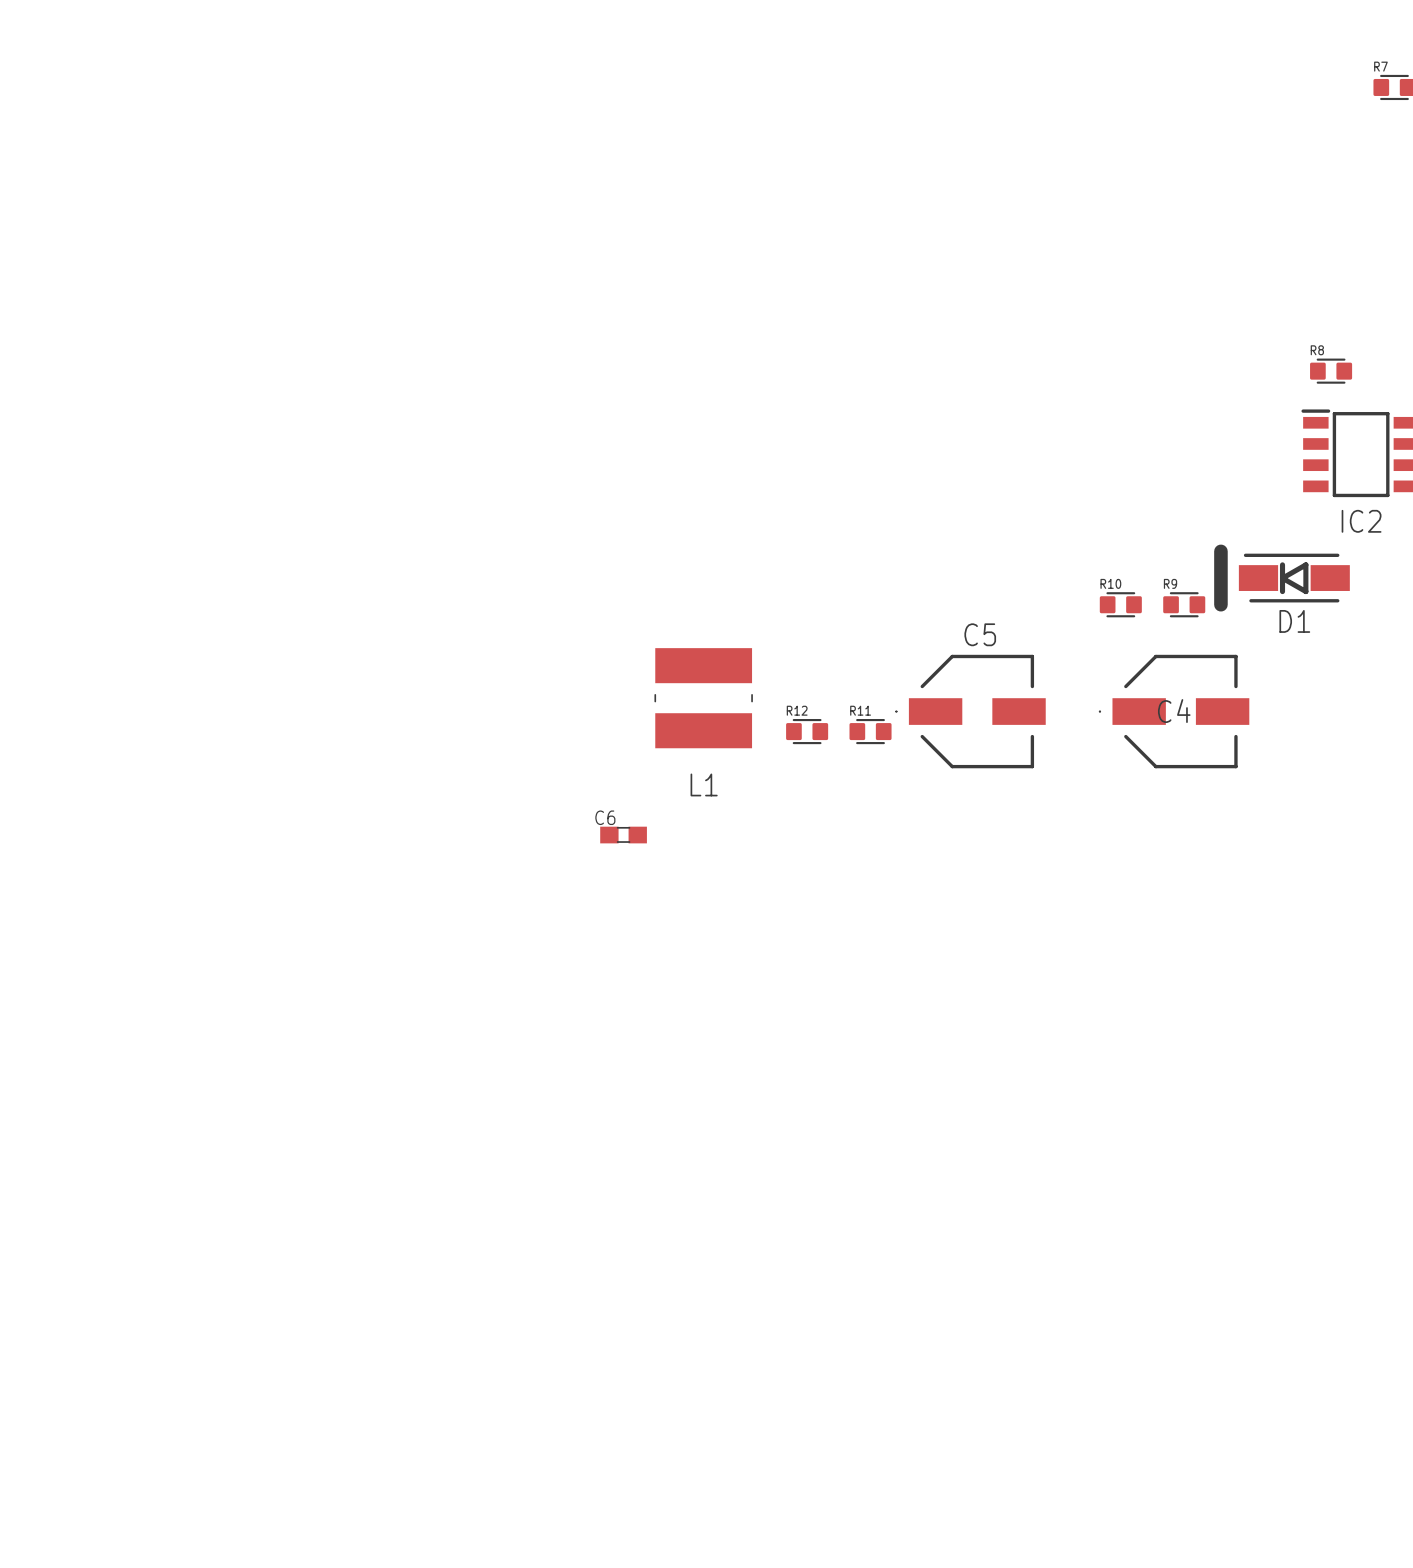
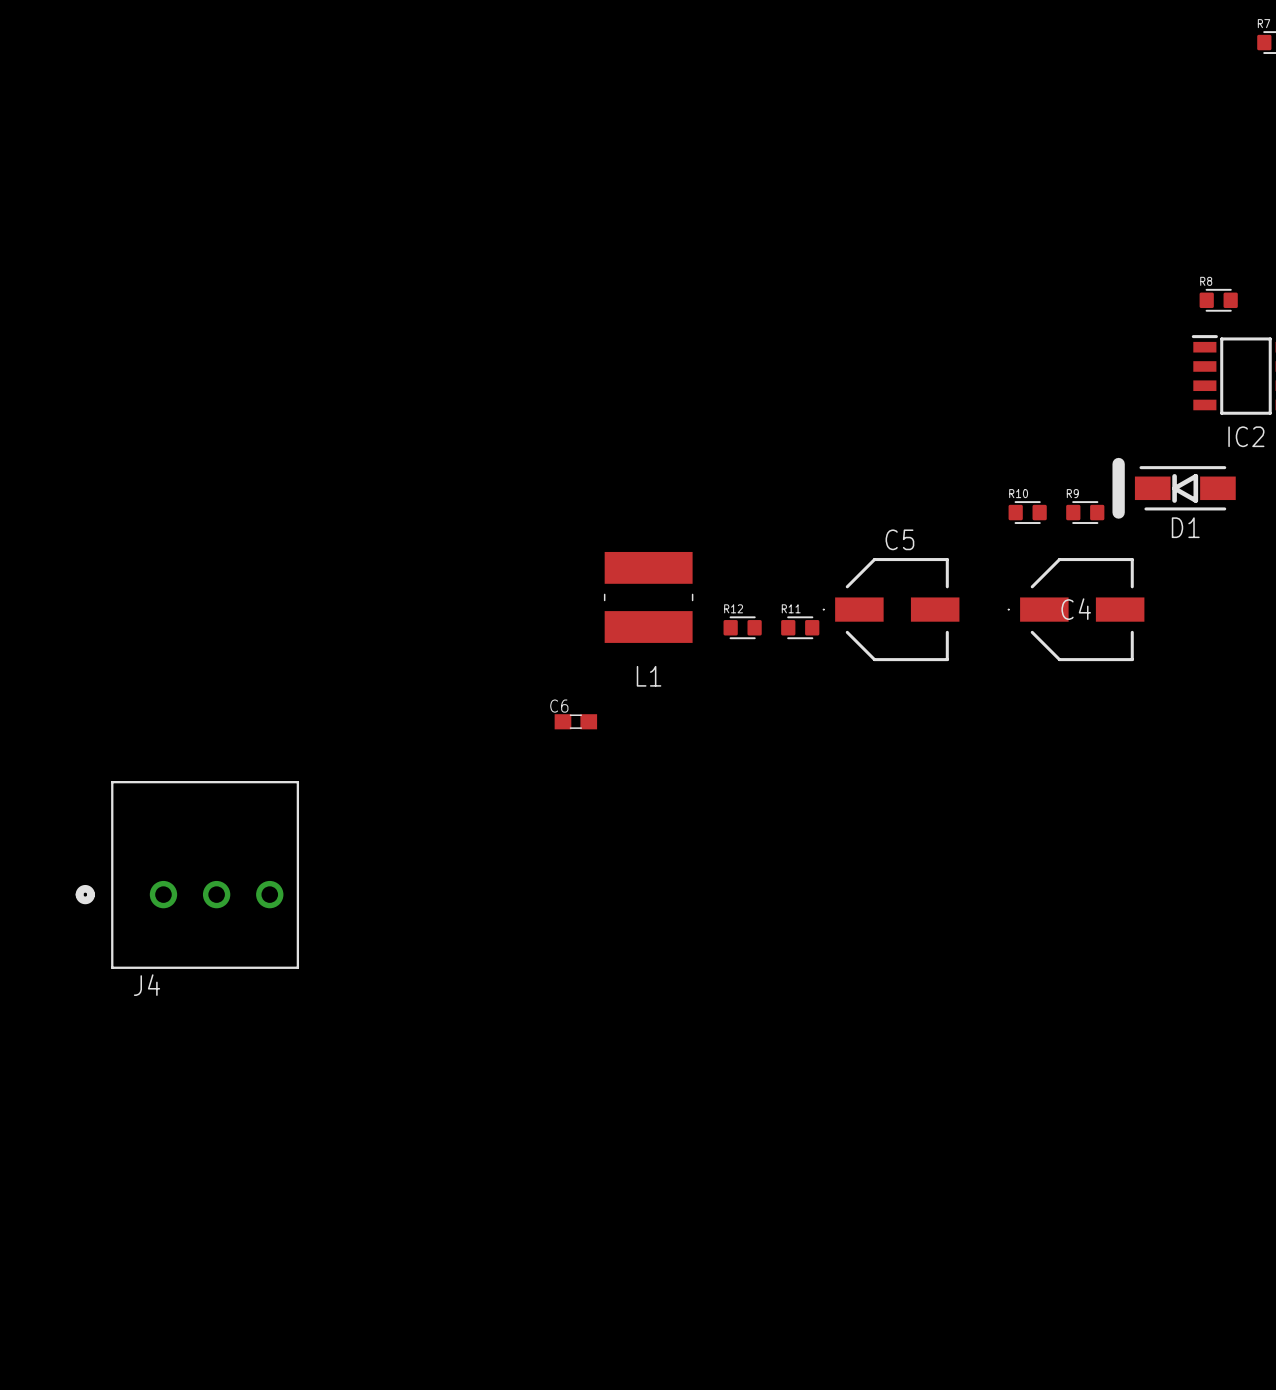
J4: none -> (187, 874)

